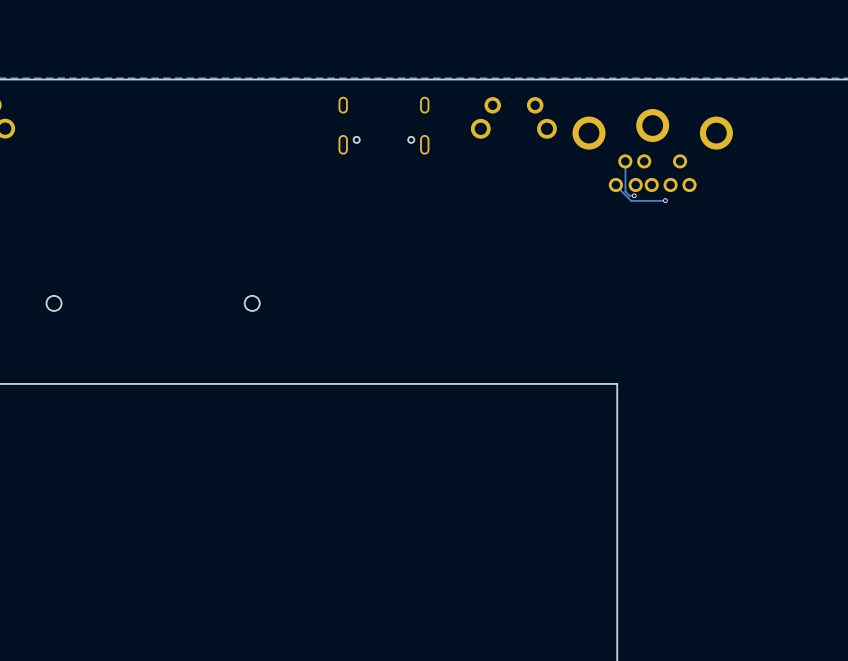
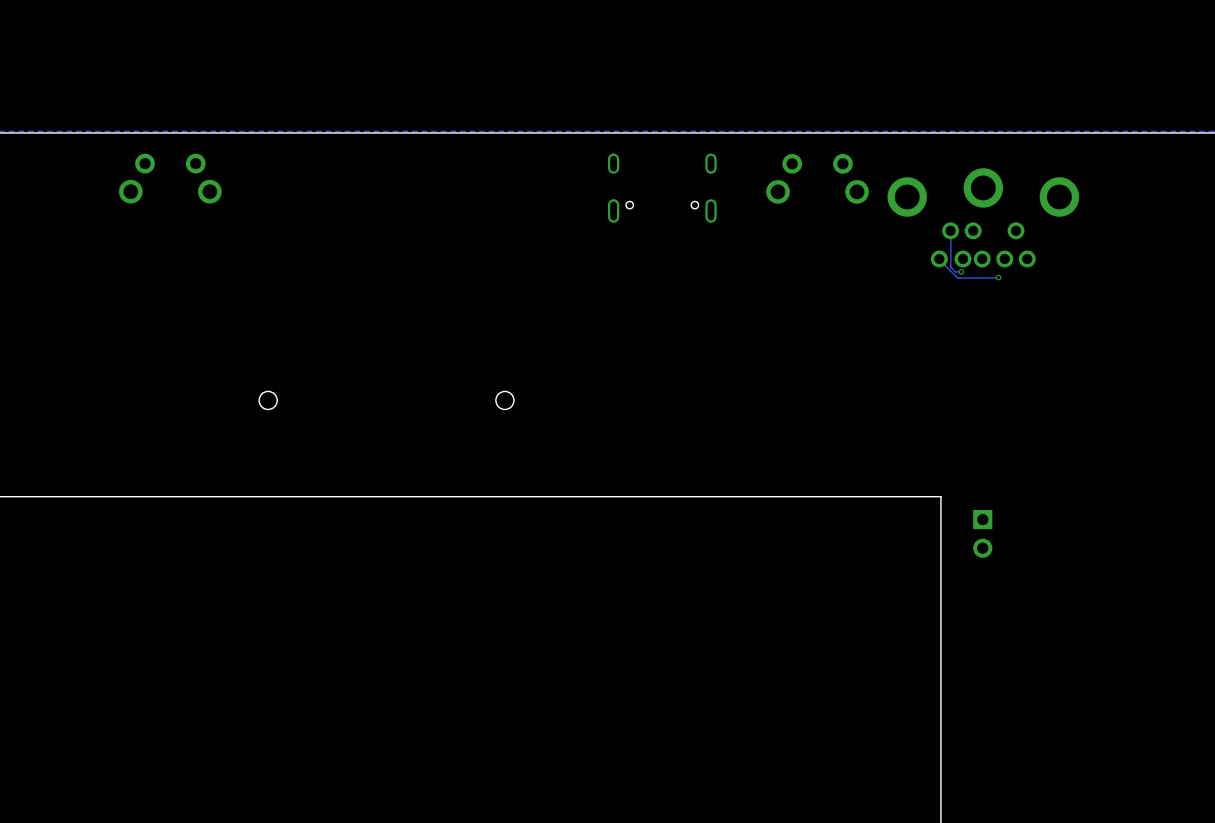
part: none -> (982, 533)

